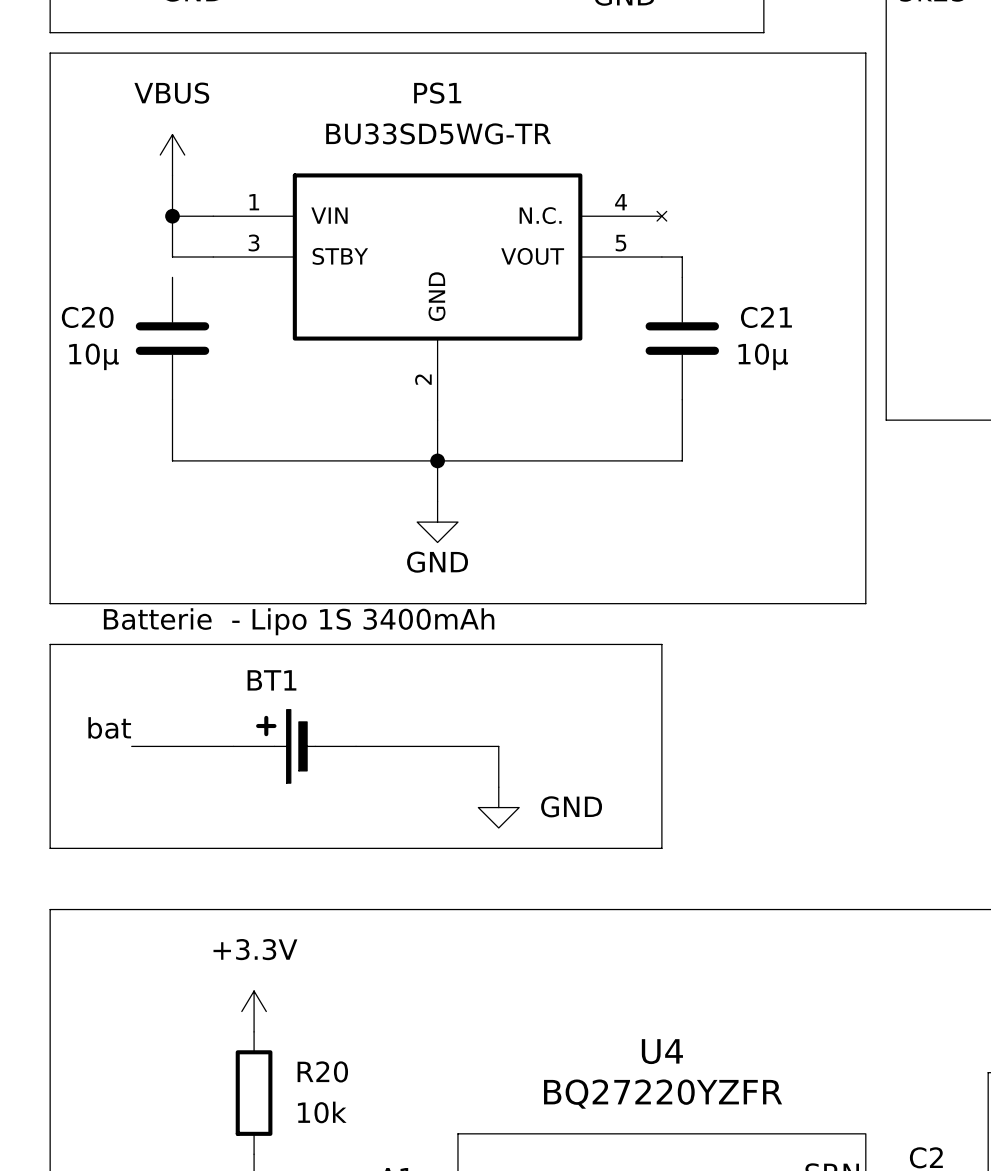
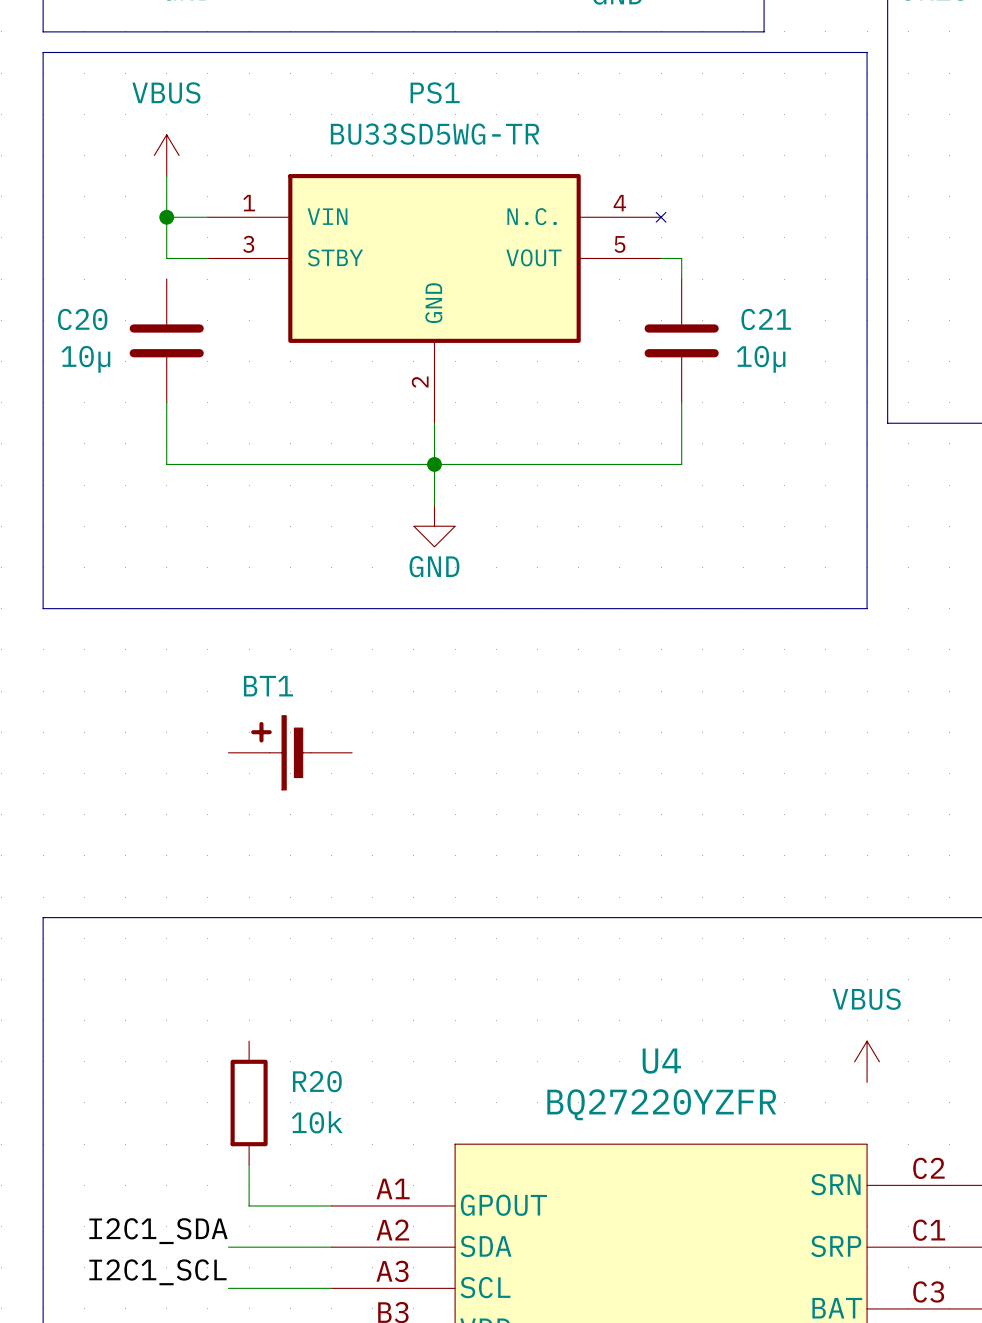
text: Batterie - Lipo 1S 3400mAh (299, 621) -> none
line: (50, 644) (50, 848) (661, 848) (661, 644) (50, 644) -> none
label: bat (109, 727) -> none
wire: (131, 746) (233, 746) -> none
wire: (356, 746) (498, 746) (498, 787) -> none
power symbol: GND (498, 807) -> none
power symbol: +3.3V (254, 1011) -> none
power symbol: none -> VBUS (867, 1061)

